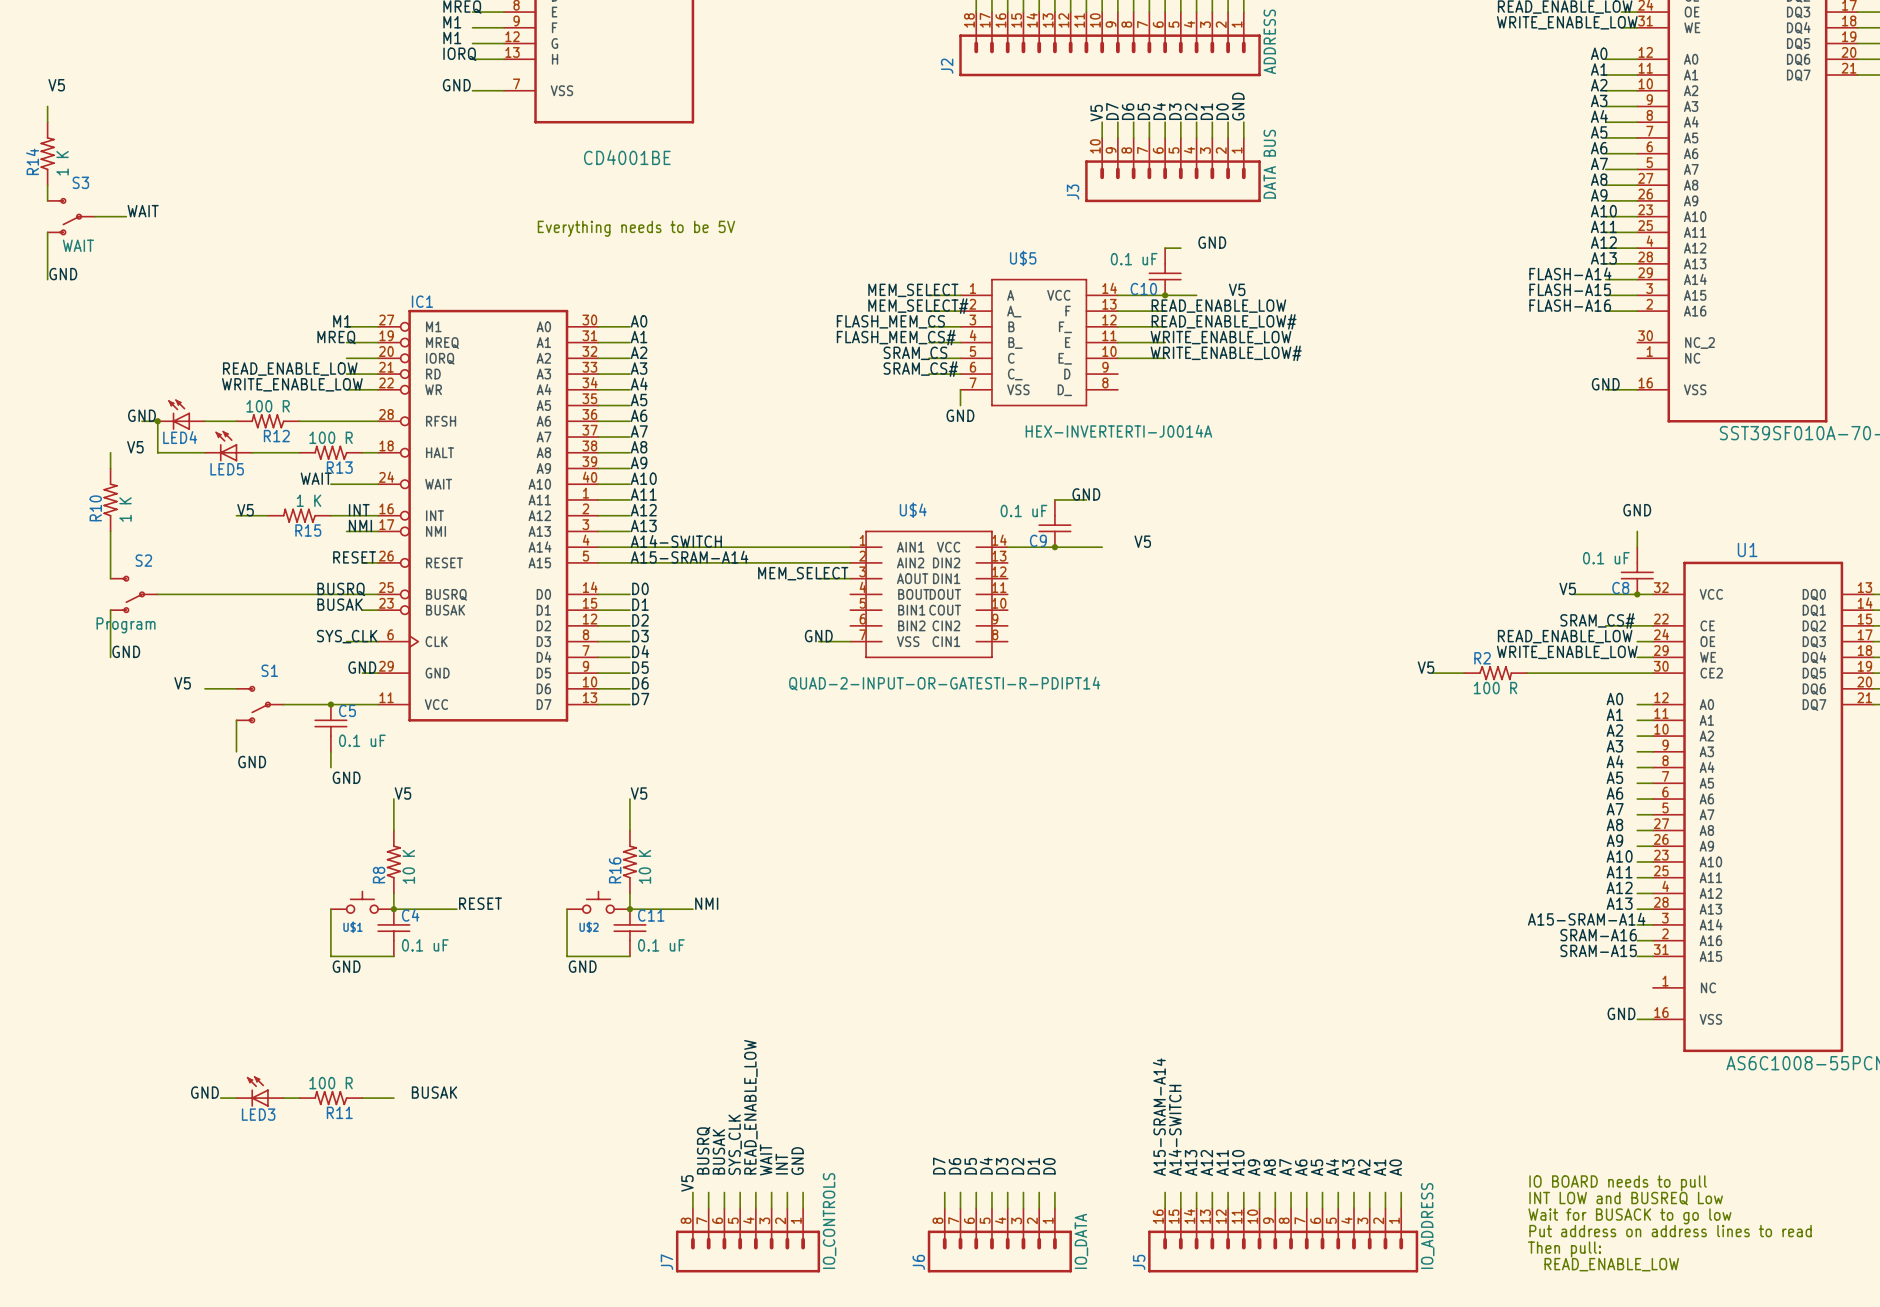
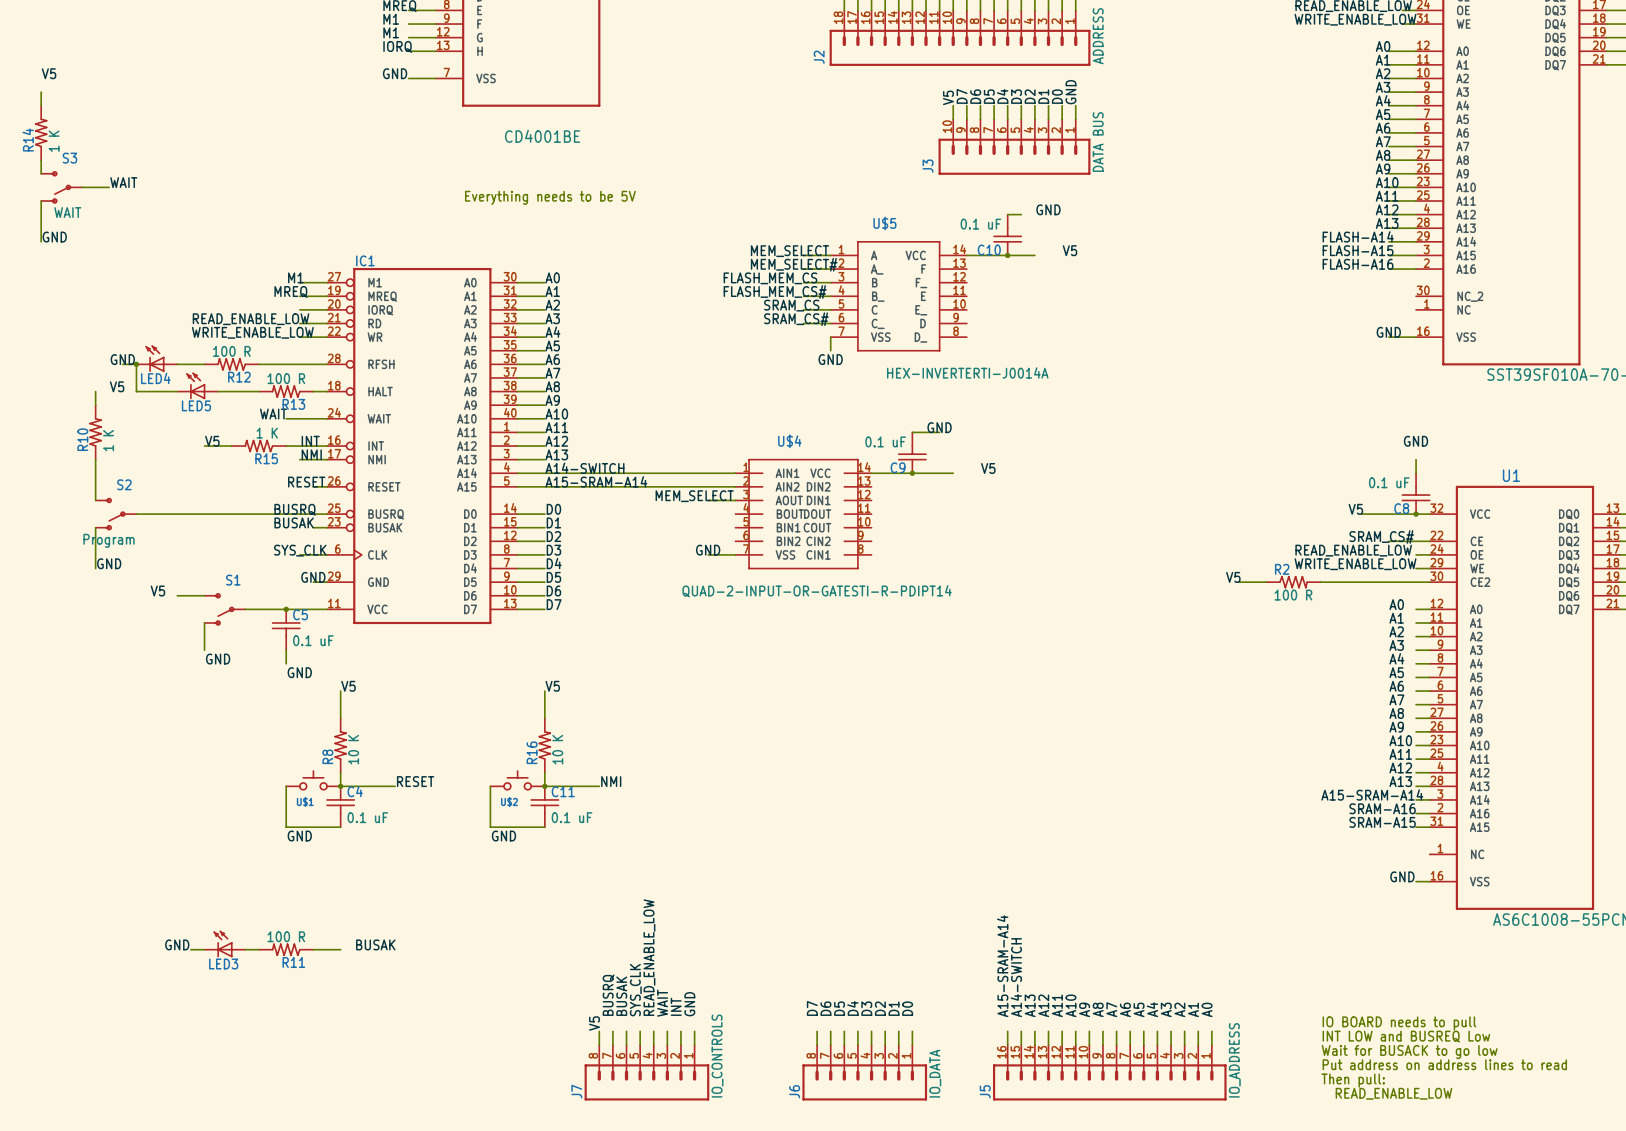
label: READ_ENABLE_LOW (1218, 306) -> none
wire: (1117, 311) (1165, 311) -> none
label: READ_ENABLE_LOW# (1224, 321) -> none
wire: (1117, 326) (1165, 326) -> none
label: WRITE_ENABLE_LOW (1221, 337) -> none
wire: (1117, 342) (1165, 342) -> none
label: WRITE_ENABLE_LOW# (1226, 353) -> none
wire: (1117, 358) (1165, 358) -> none

